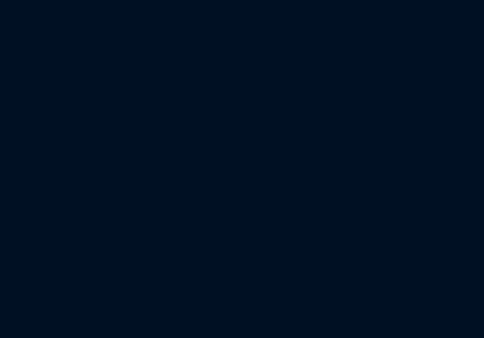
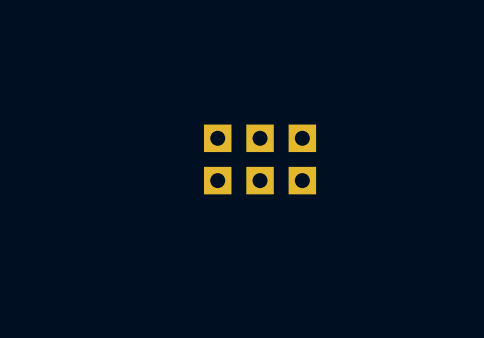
part: none -> (260, 159)

